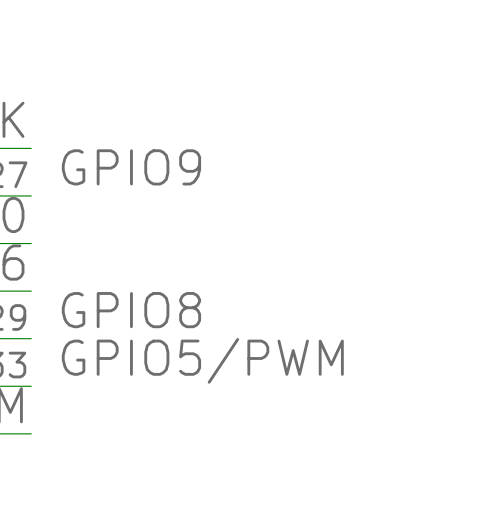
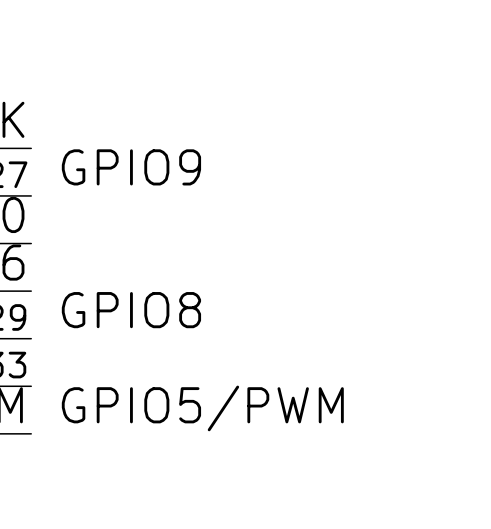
label position: GPIO5/PWM (202, 360) -> GPIO5/PWM (202, 408)

